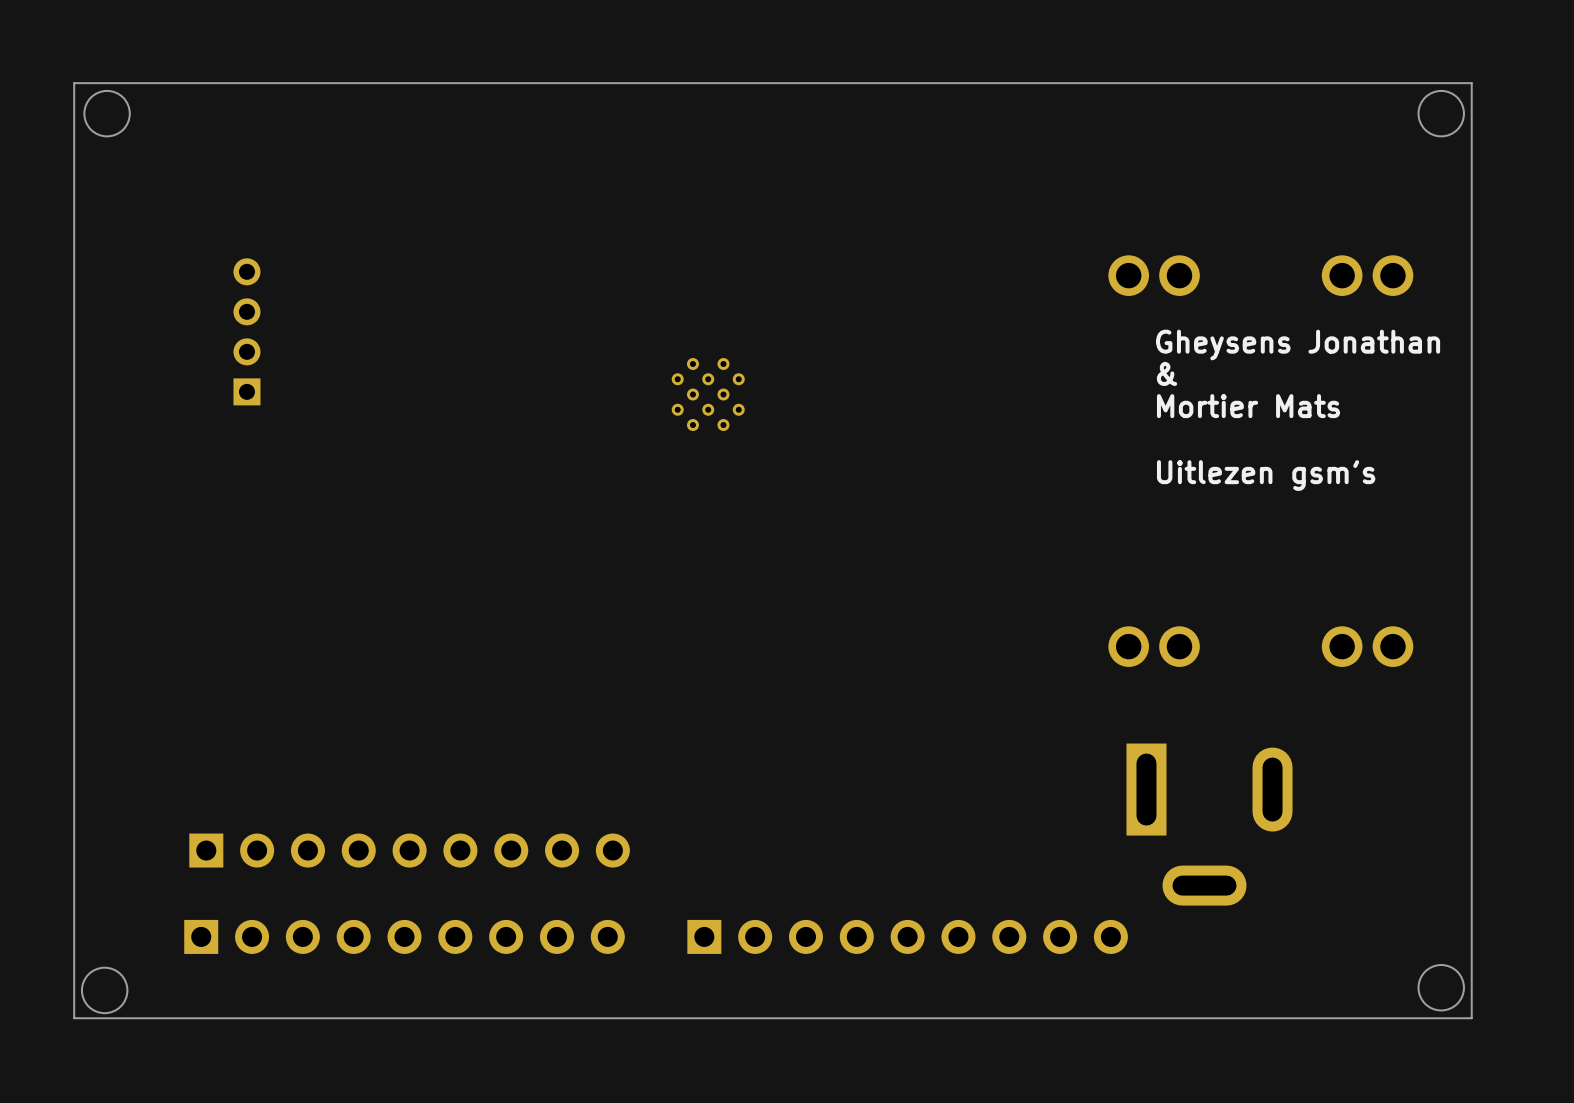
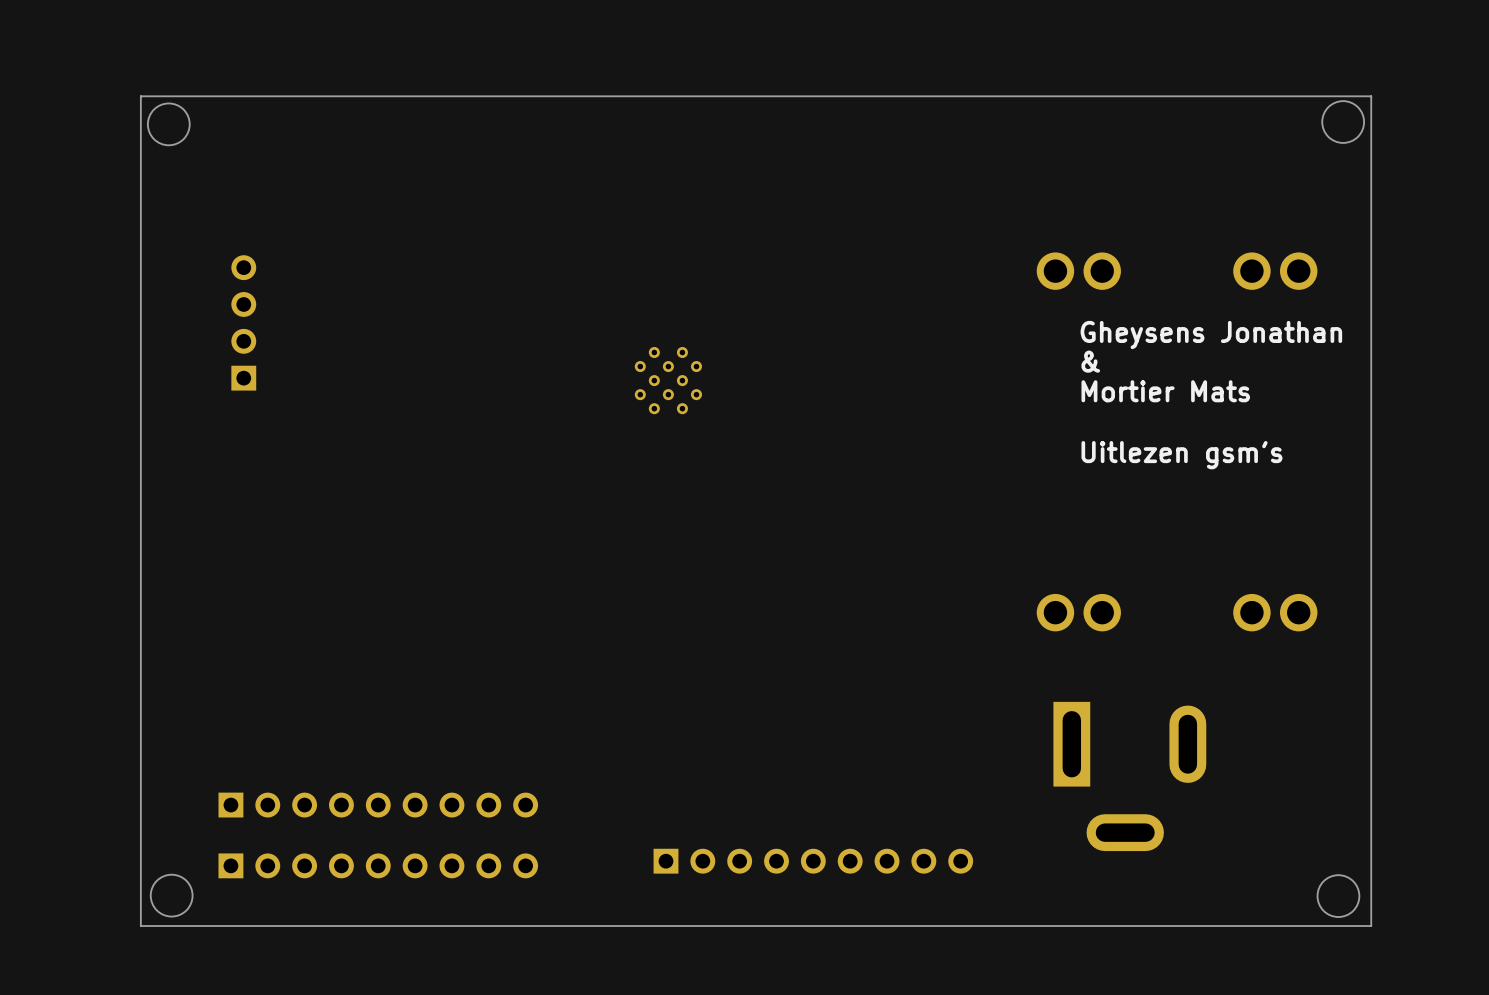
board edge: (1471, 85) (1471, 83) (74, 83) (74, 1018) (1471, 1018) (1471, 987) -> (1371, 96) (140, 96) (140, 926) (1371, 926)
round board edge position: (107, 113) -> (168, 124)
part footprint: [189, 833, 630, 868] -> [218, 792, 539, 818]
part: none -> (813, 861)
part footprint: [184, 919, 625, 954] -> [218, 853, 539, 879]
part: (907, 936) -> none
round board edge position: (1441, 987) -> (1338, 896)
round board edge position: (104, 990) -> (171, 895)

